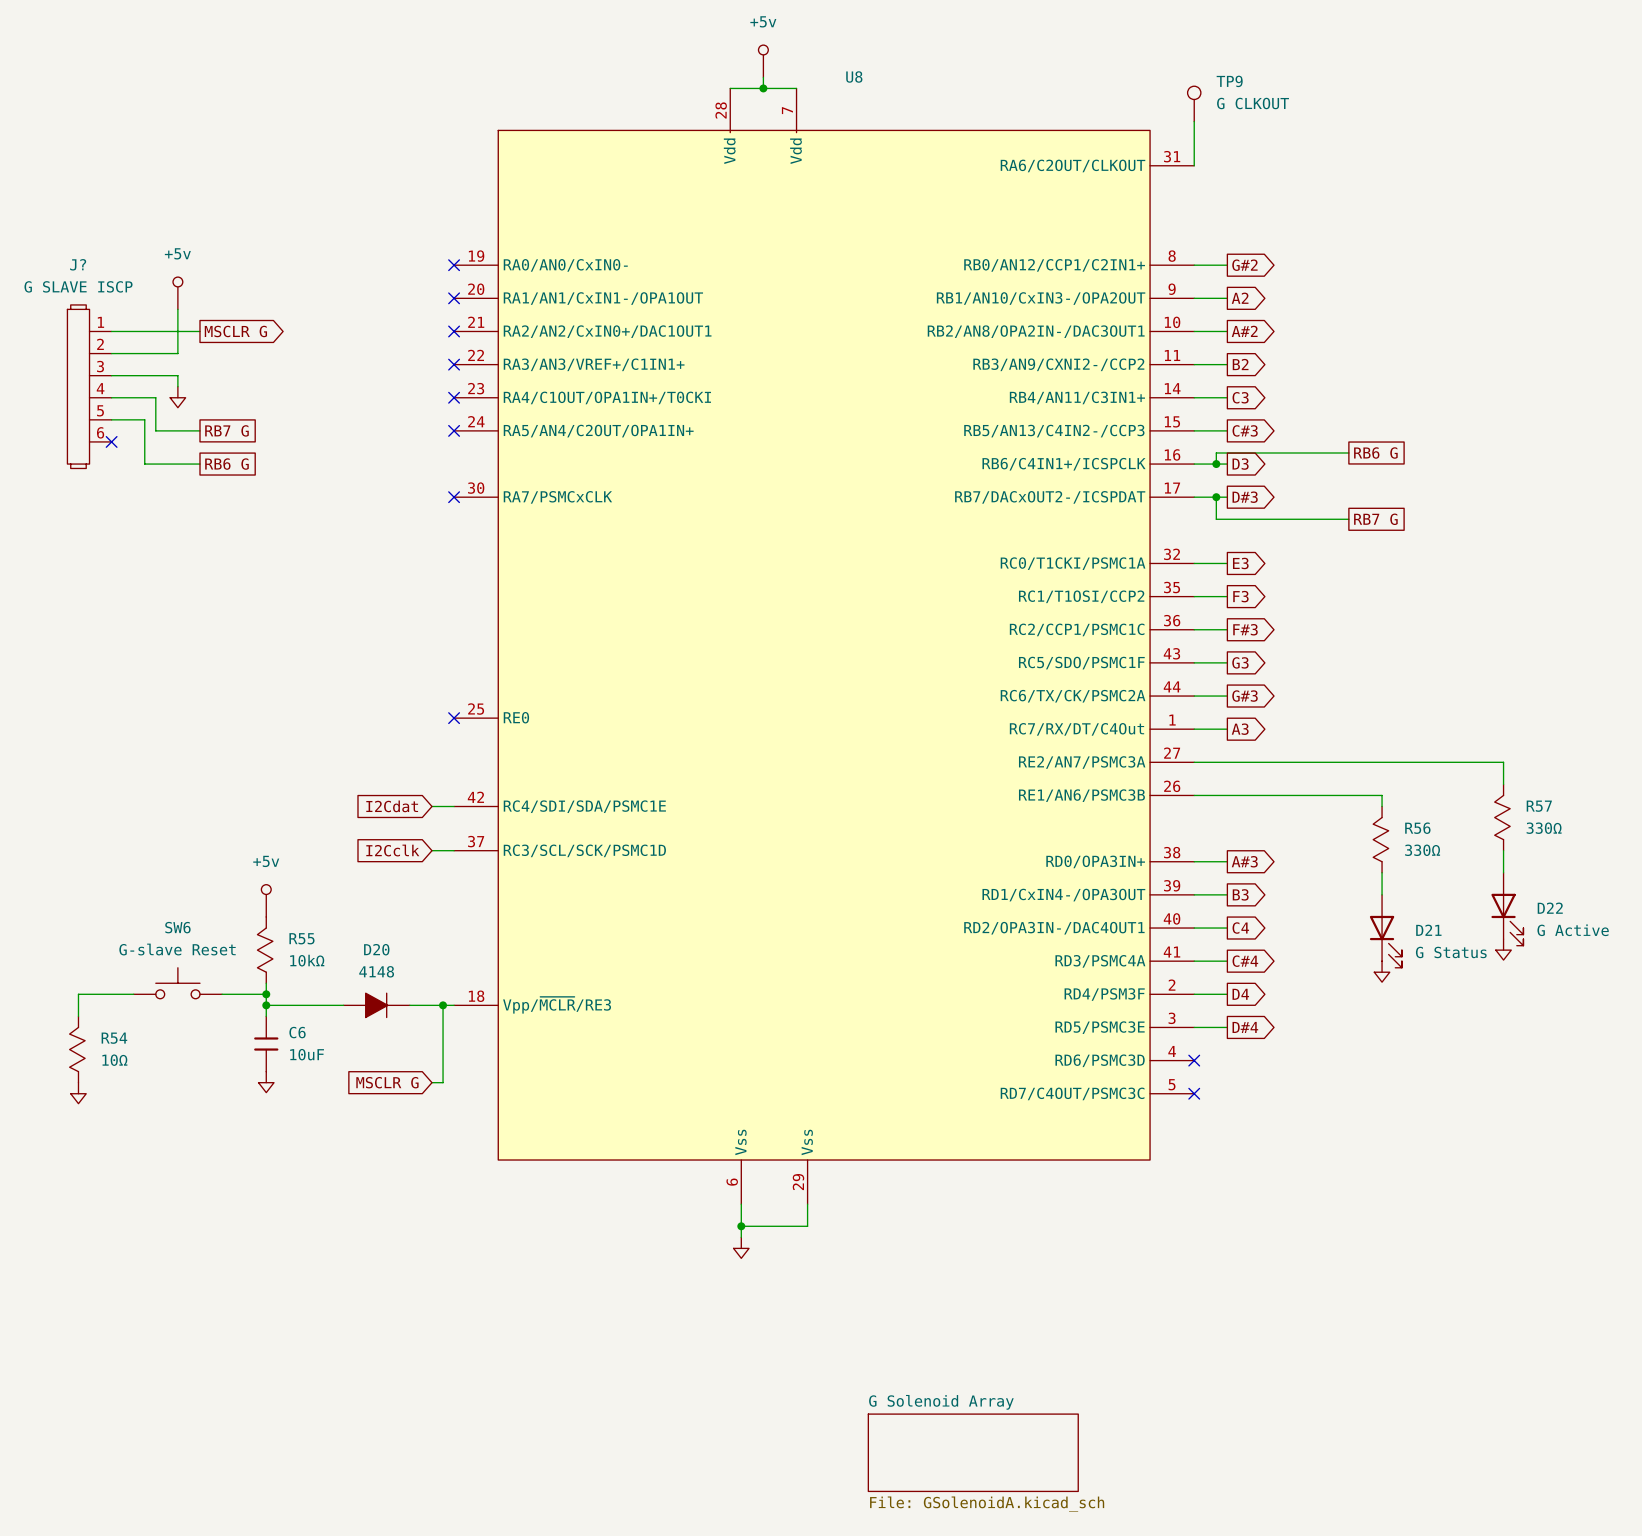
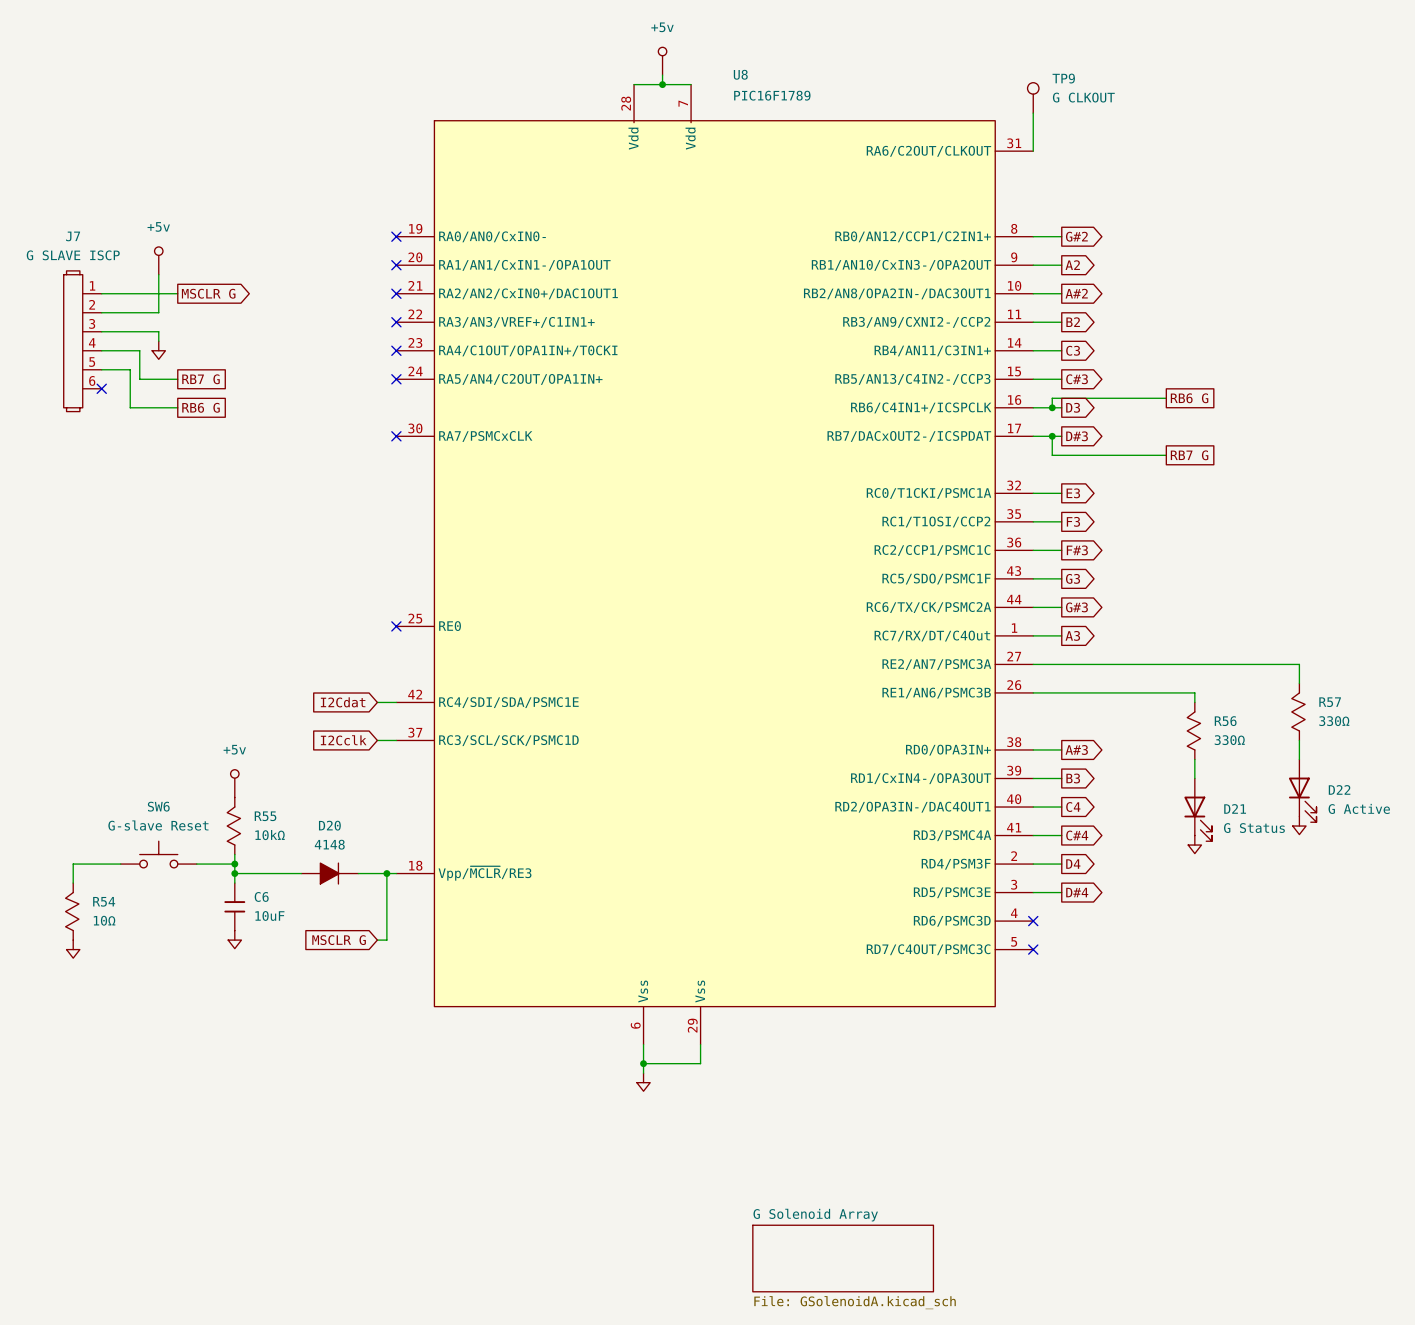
U8 value: none -> PIC16F1789 (772, 95)
J? name: J? (78, 264) -> J7 (73, 236)

